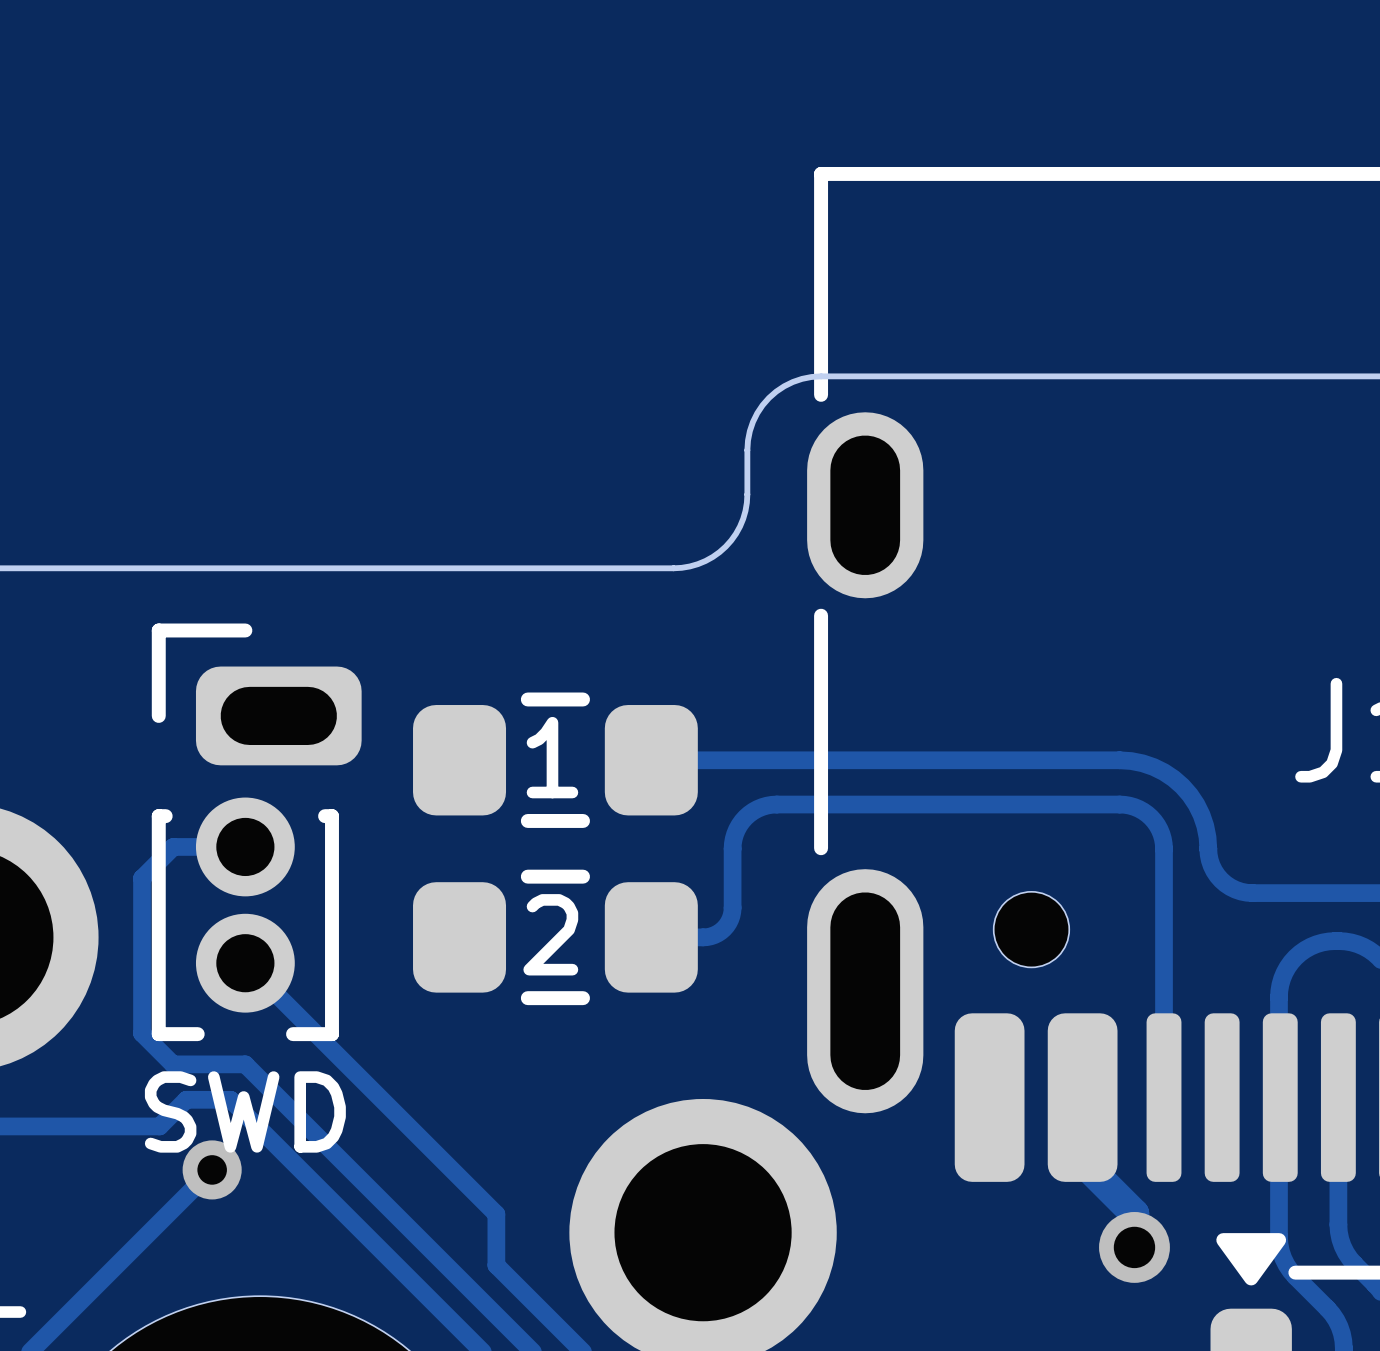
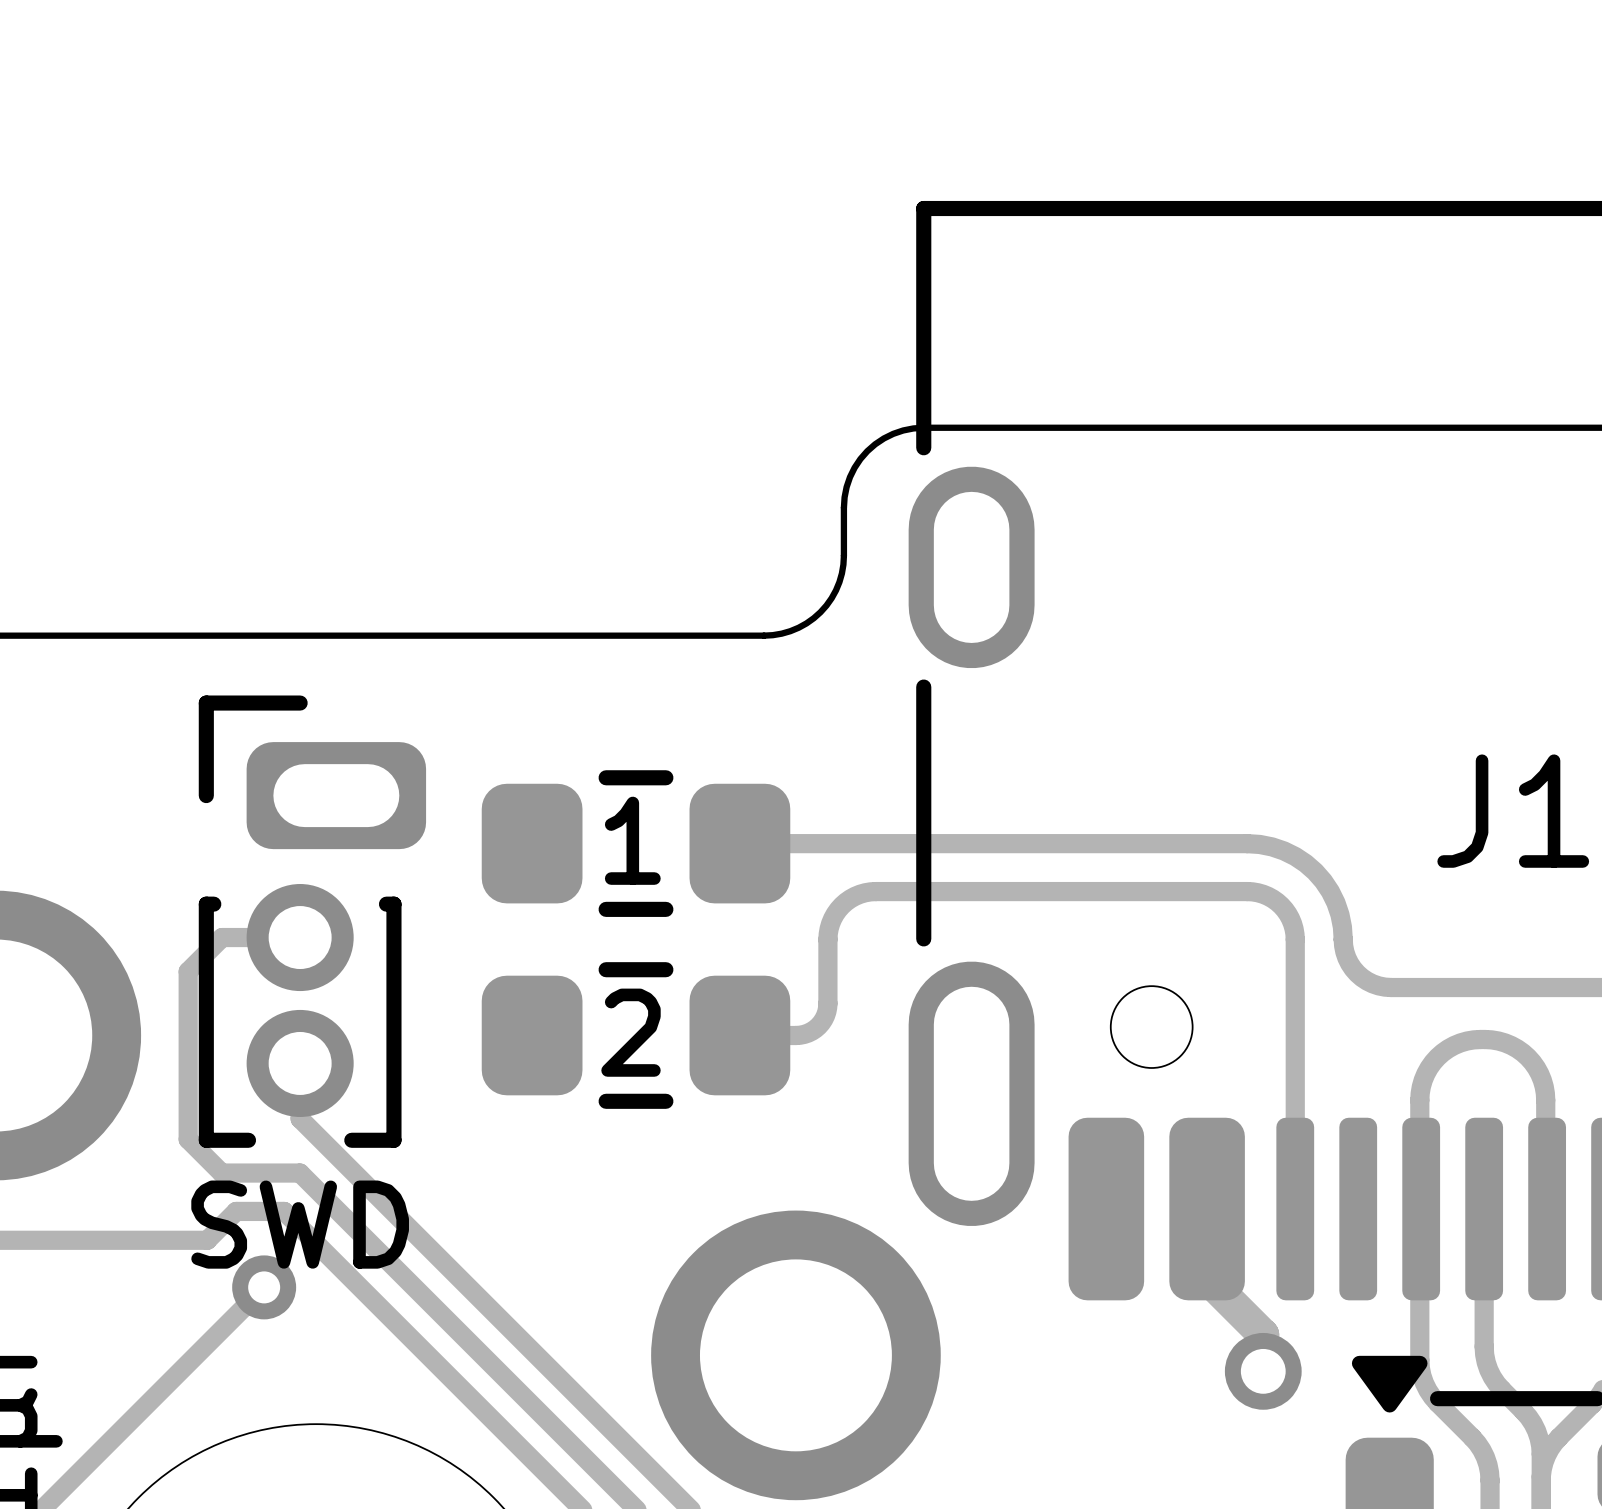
track: (245, 963) (496, 1214) (496, 1265) -> (300, 1063) (300, 1118) (572, 1390)

